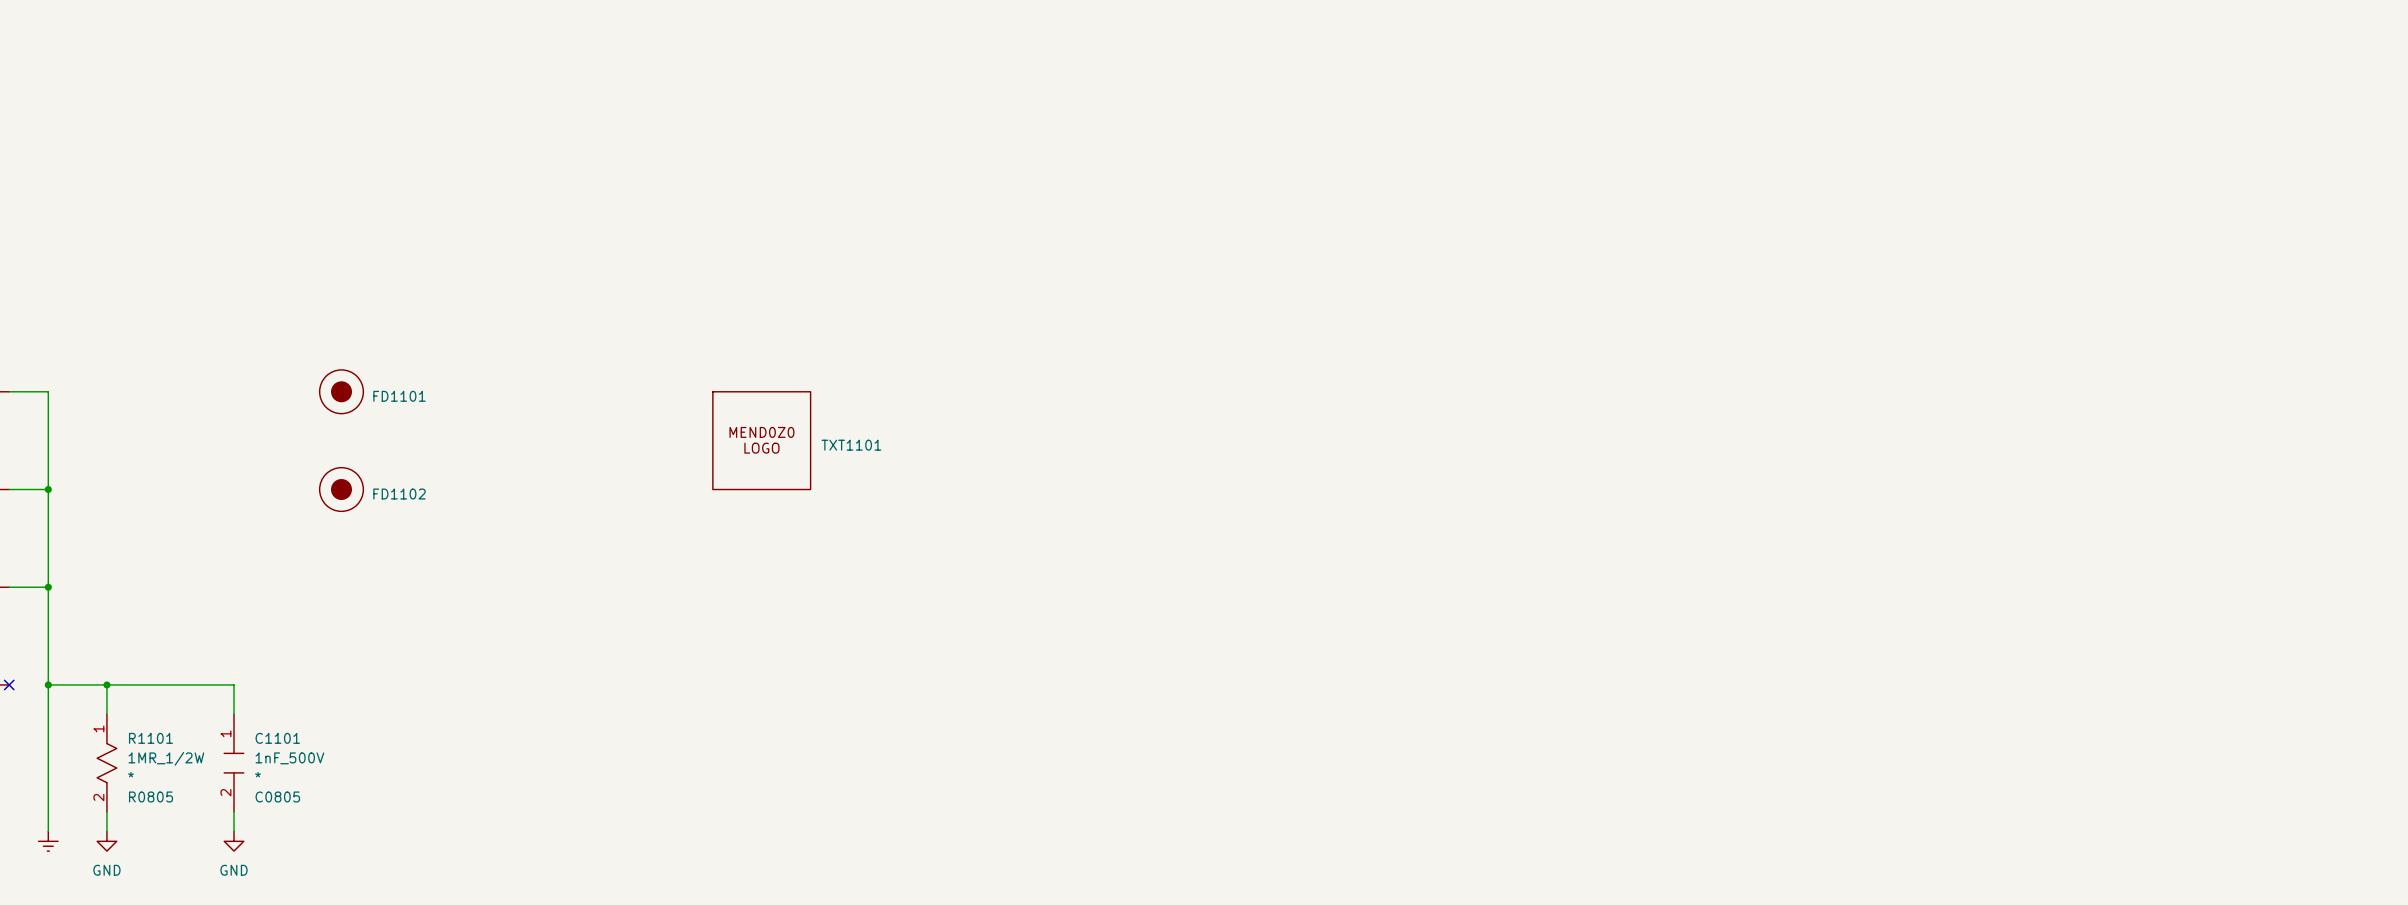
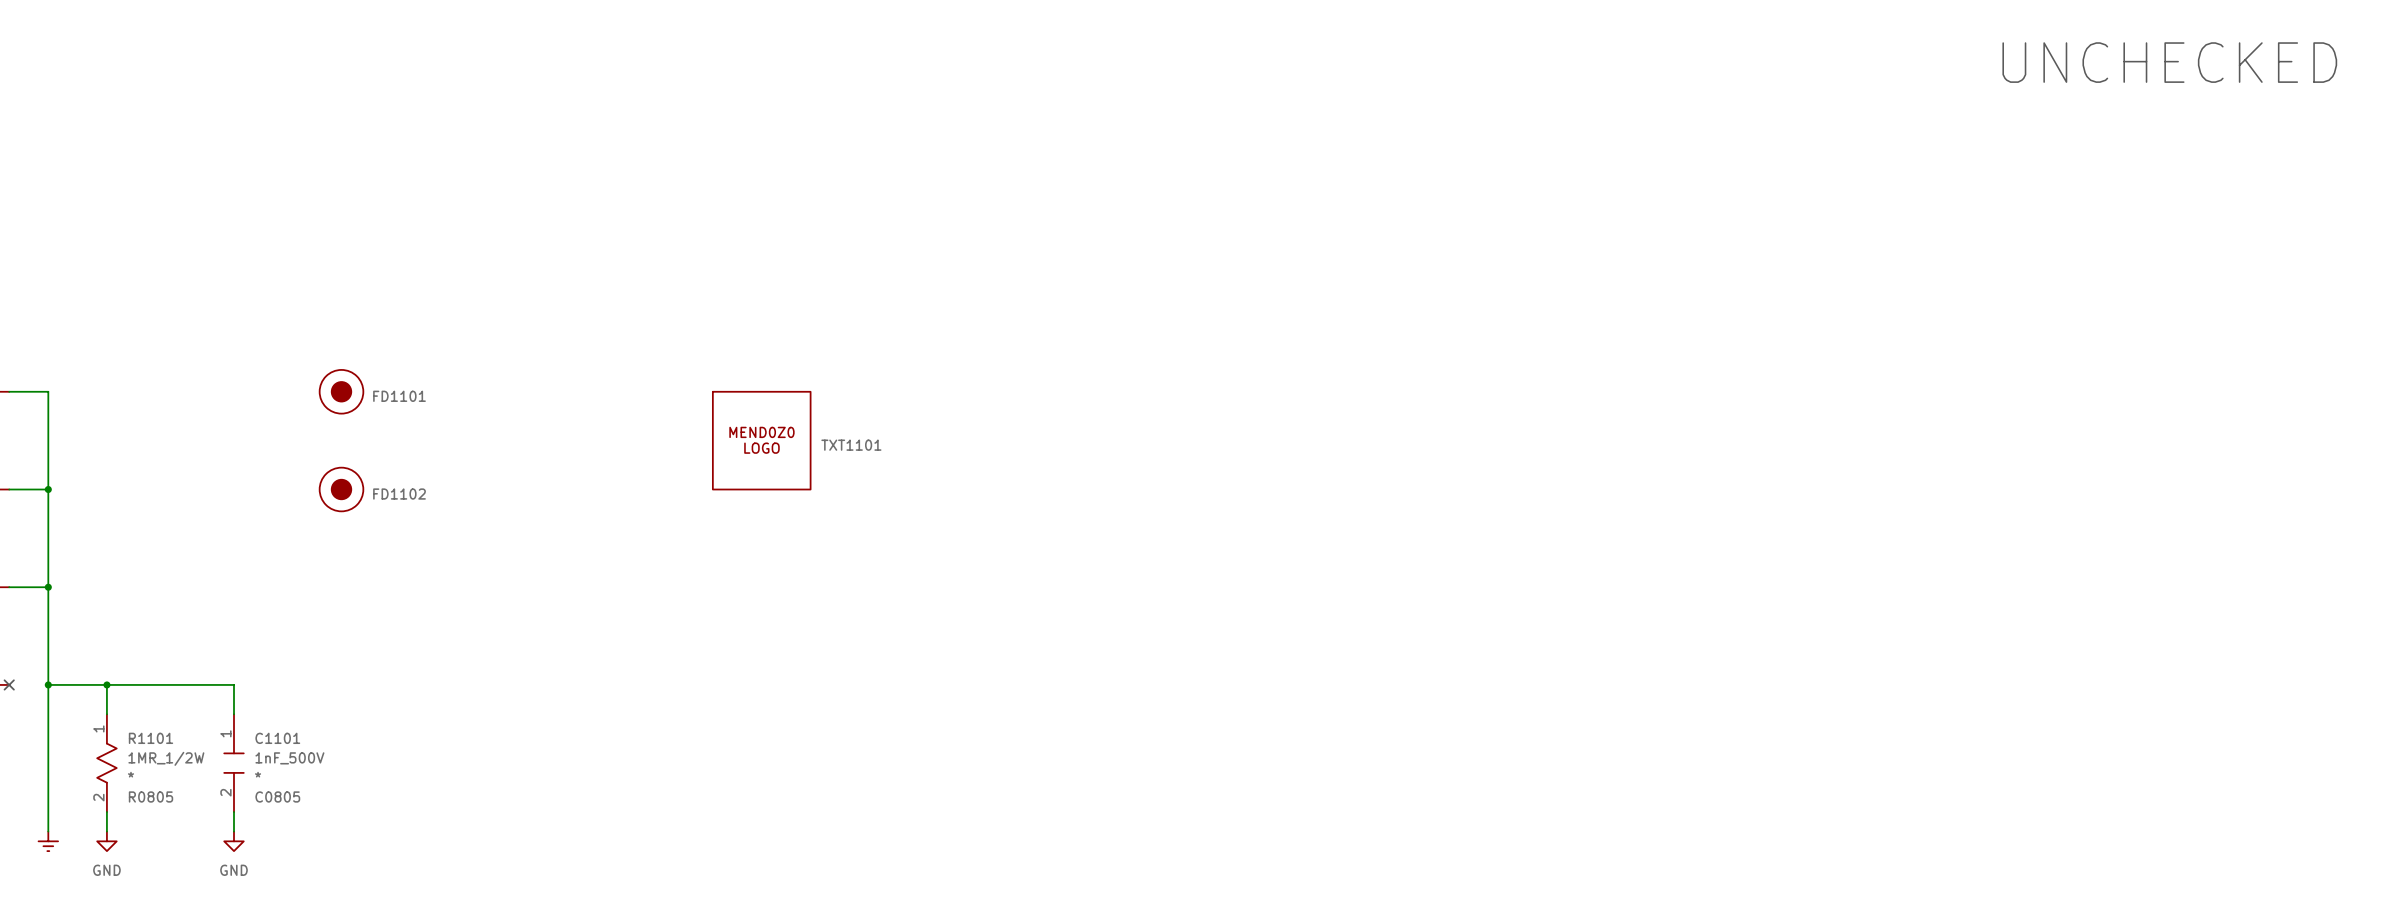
text: none -> UNCHECKED (2169, 62)

